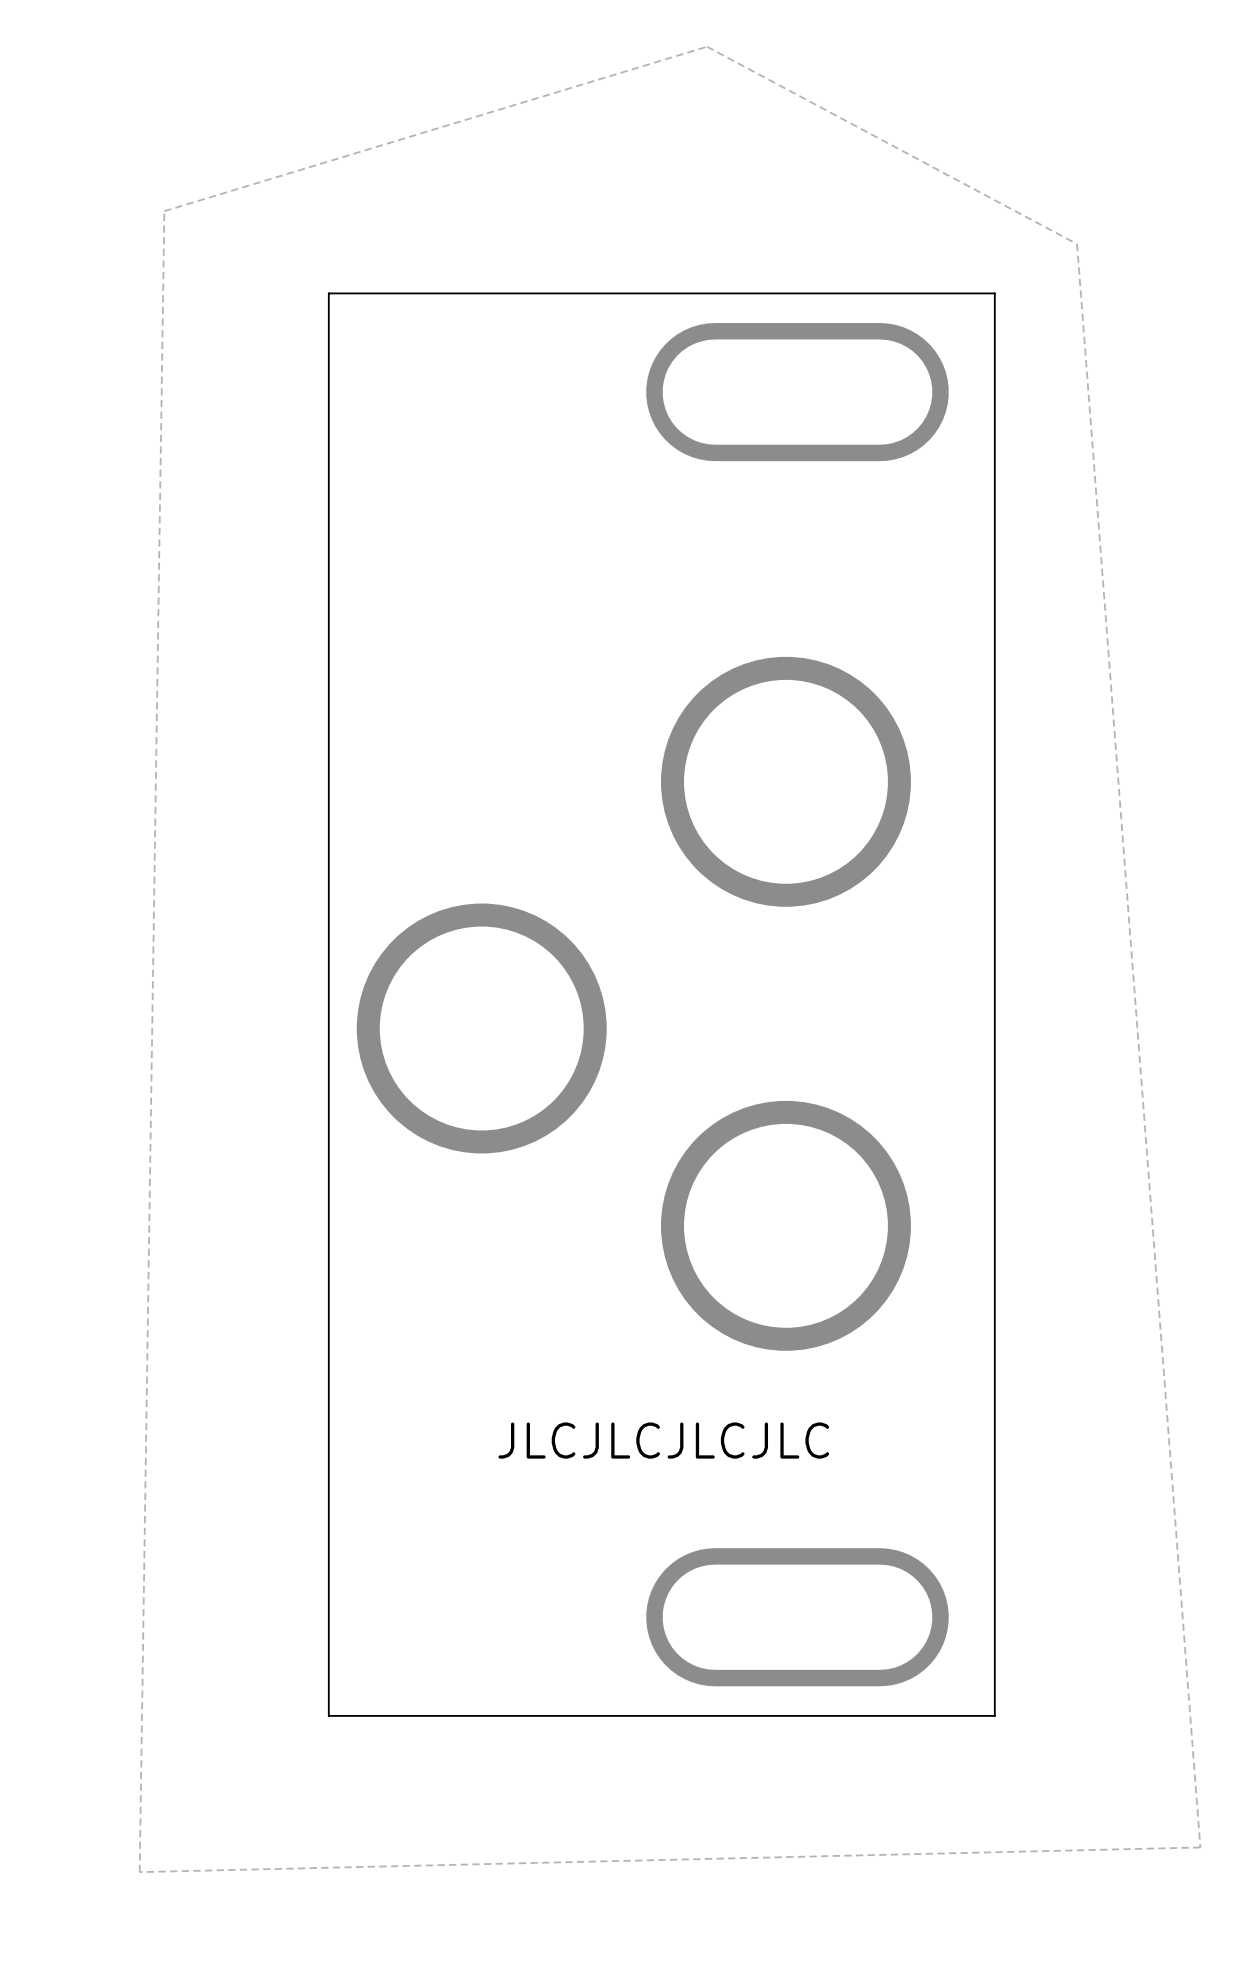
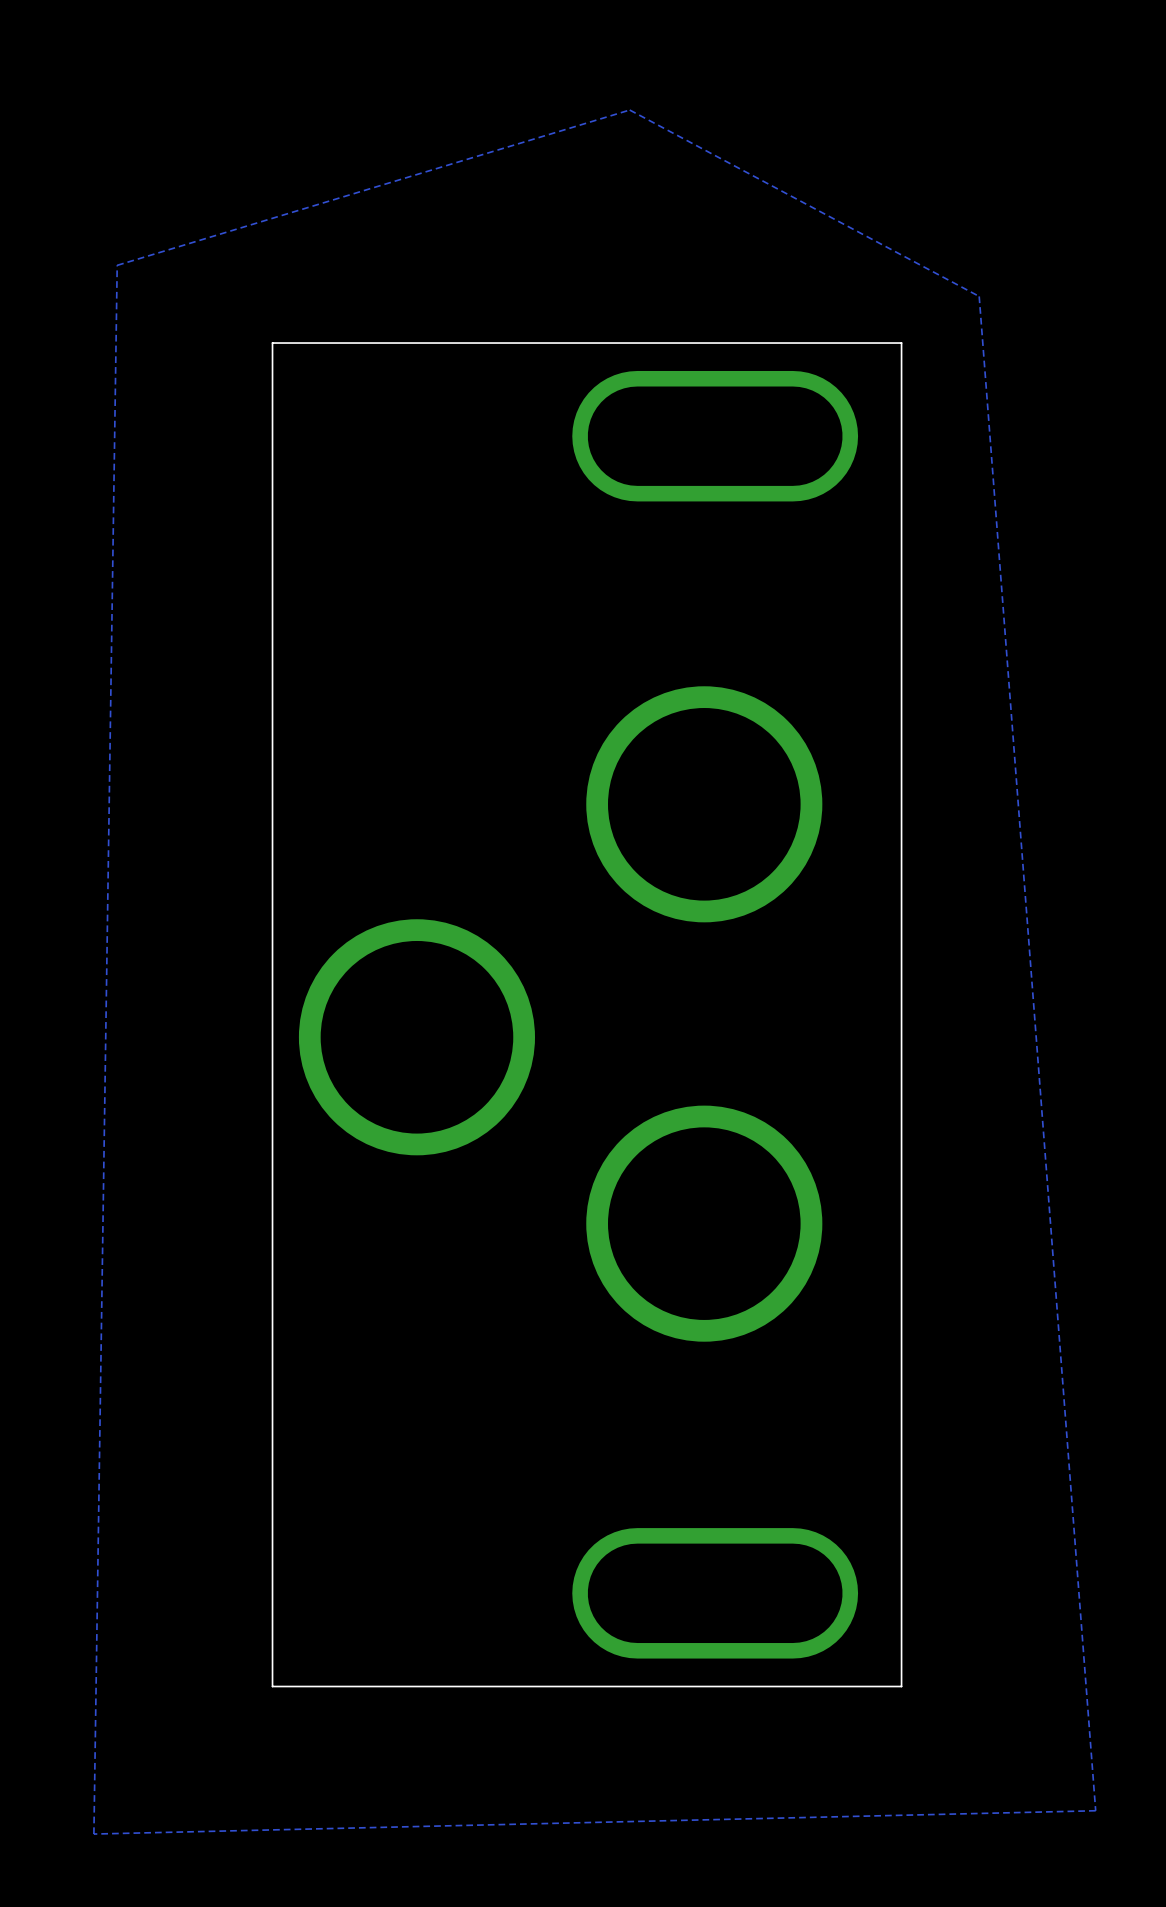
text: JLCJLCJLCJLC (663, 1440) -> none

